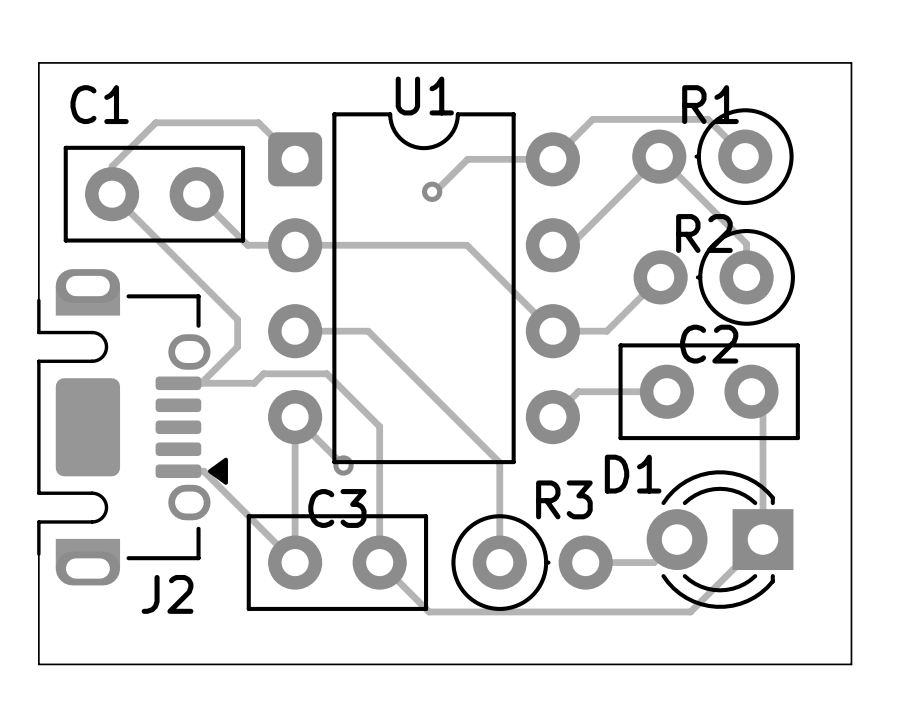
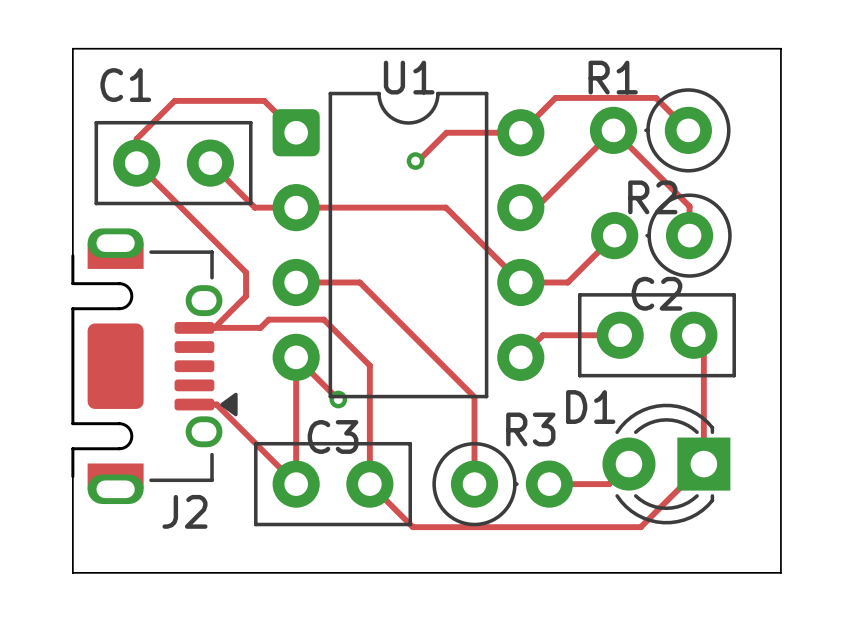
R1 name position: R1 (710, 104) -> R1 (613, 77)

